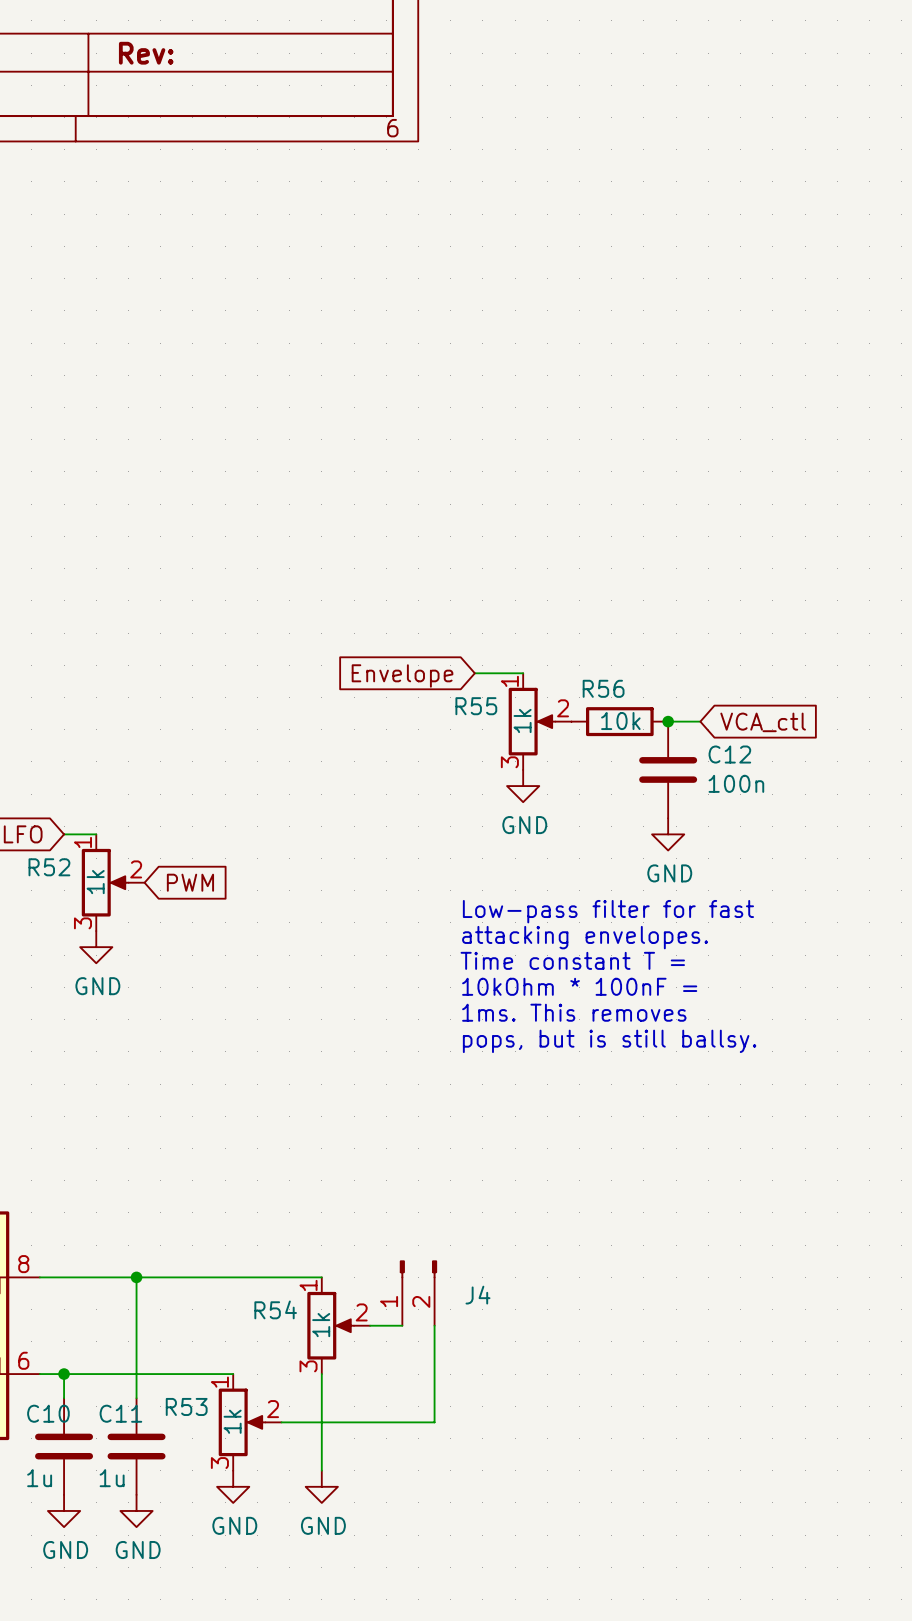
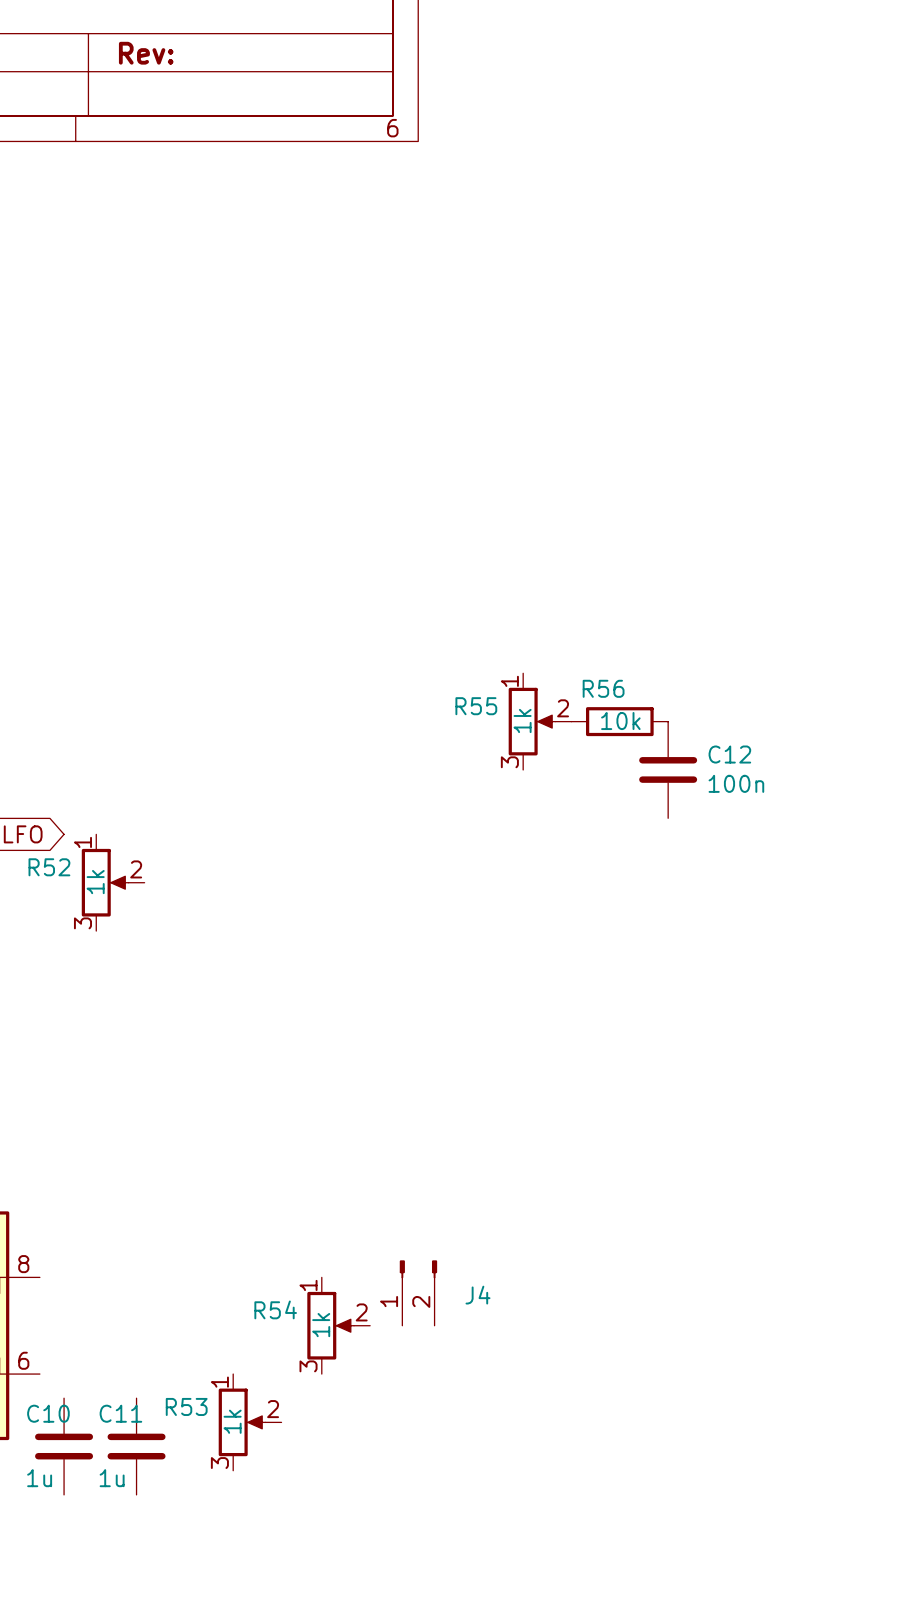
wire: (474, 673) (523, 673) -> none
global label: Envelope (402, 675) -> none
wire: (668, 721) (700, 721) -> none
junction: (668, 721) -> none
global label: VCA_ctl (763, 722) -> none
power symbol: GND (523, 786) -> none
wire: (64, 834) (96, 834) -> none
power symbol: GND (668, 834) -> none
global label: PWM (190, 882) -> none
text: Low-pass filter for fast (608, 911) -> none
text: attacking envelopes. (585, 937) -> none
power symbol: GND (96, 947) -> none
text: Time constant T = (572, 960) -> none
text: 10kOhm * 100nF = (579, 986) -> none
text: 1ms. This removes (574, 1012) -> none
text: pops, but is still ballsy. (609, 1041) -> none
wire: (39, 1277) (321, 1277) -> none
wire: (136, 1277) (136, 1398) -> none
junction: (136, 1277) -> none
wire: (370, 1325) (402, 1325) -> none
wire: (434, 1325) (434, 1422) (281, 1422) -> none
wire: (39, 1374) (233, 1374) -> none
wire: (64, 1374) (64, 1398) -> none
junction: (64, 1374) -> none
wire: (321, 1374) (321, 1470) -> none
power symbol: GND (233, 1486) -> none
power symbol: GND (321, 1486) -> none
power symbol: GND (64, 1510) -> none
power symbol: GND (136, 1510) -> none

